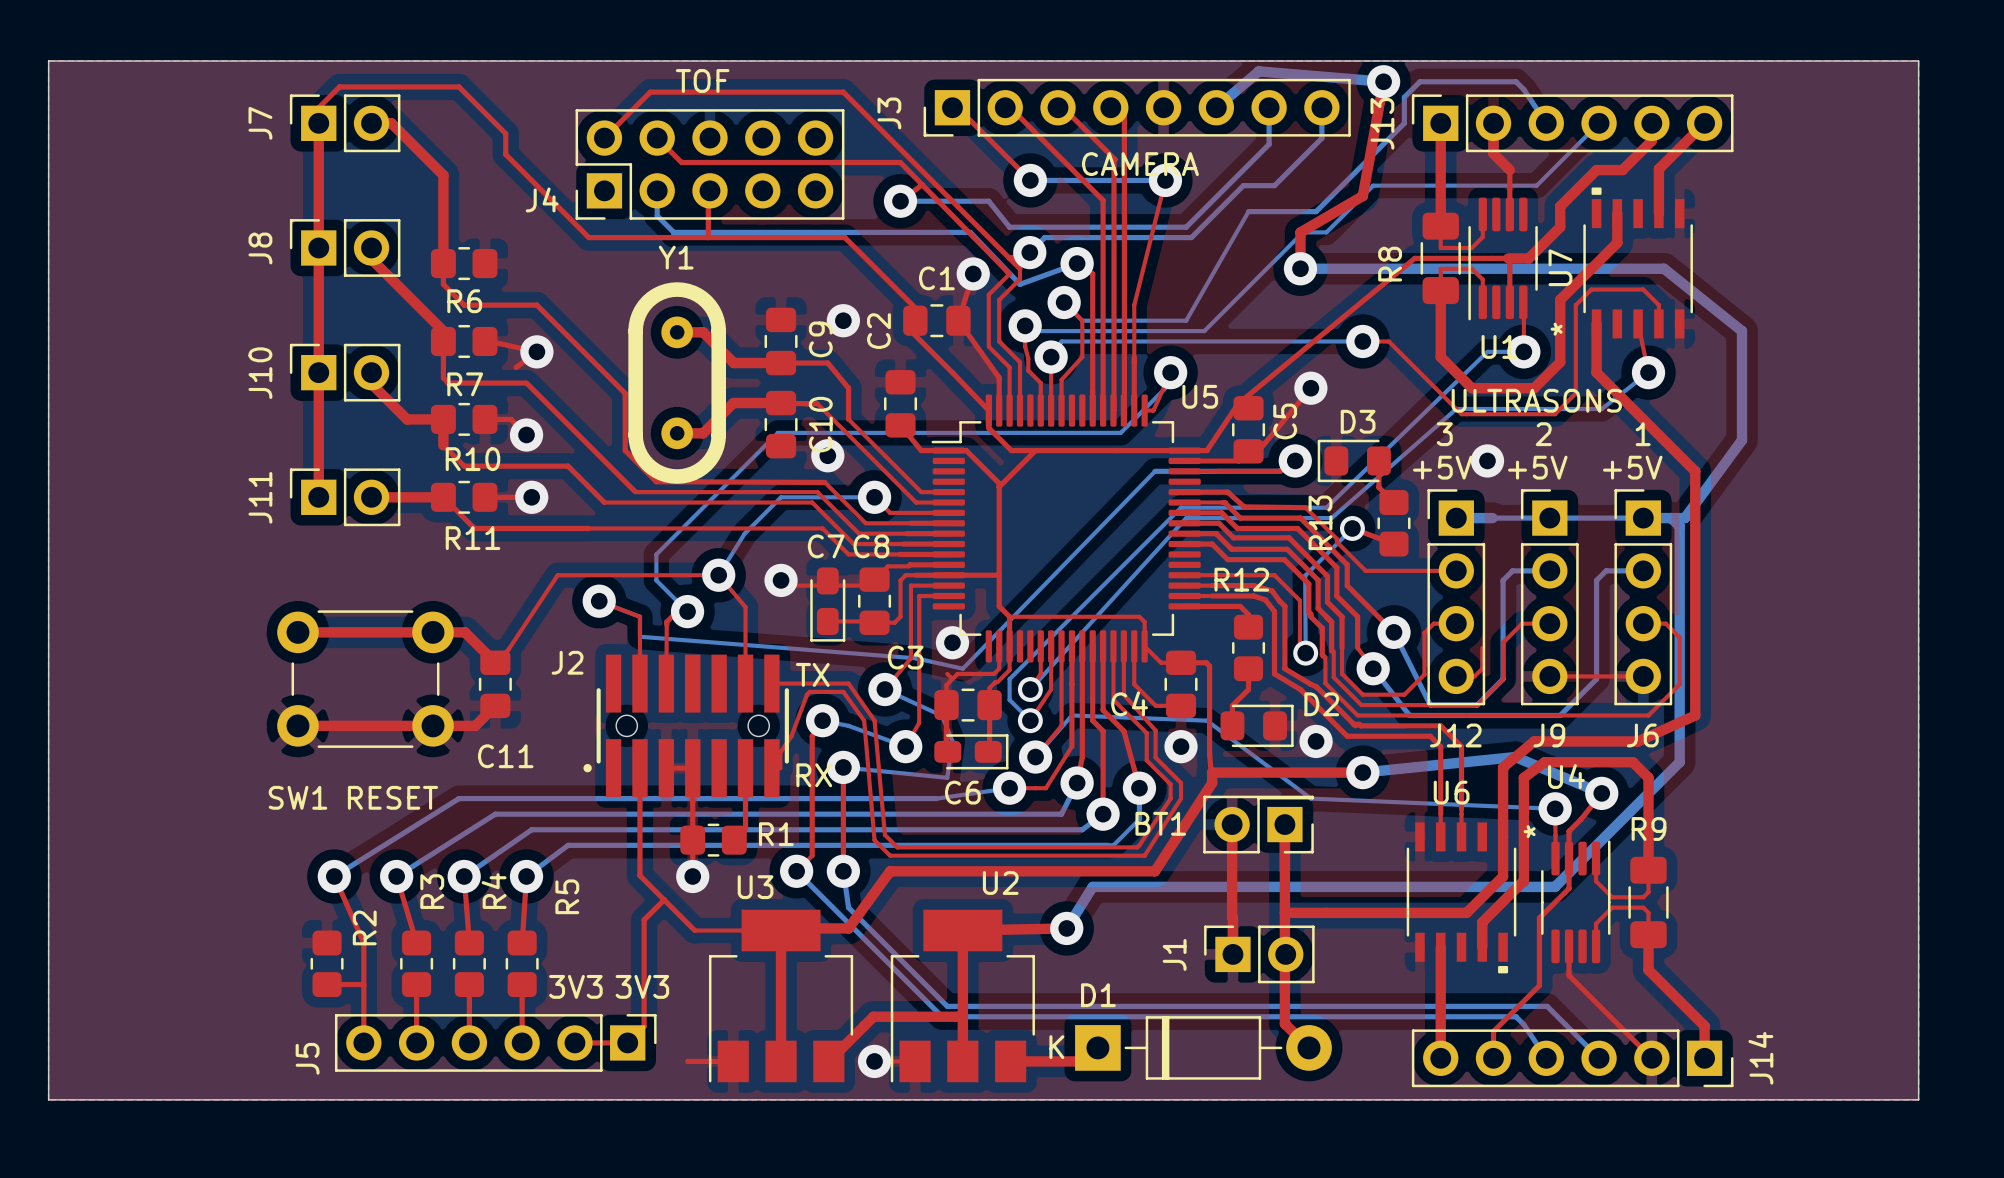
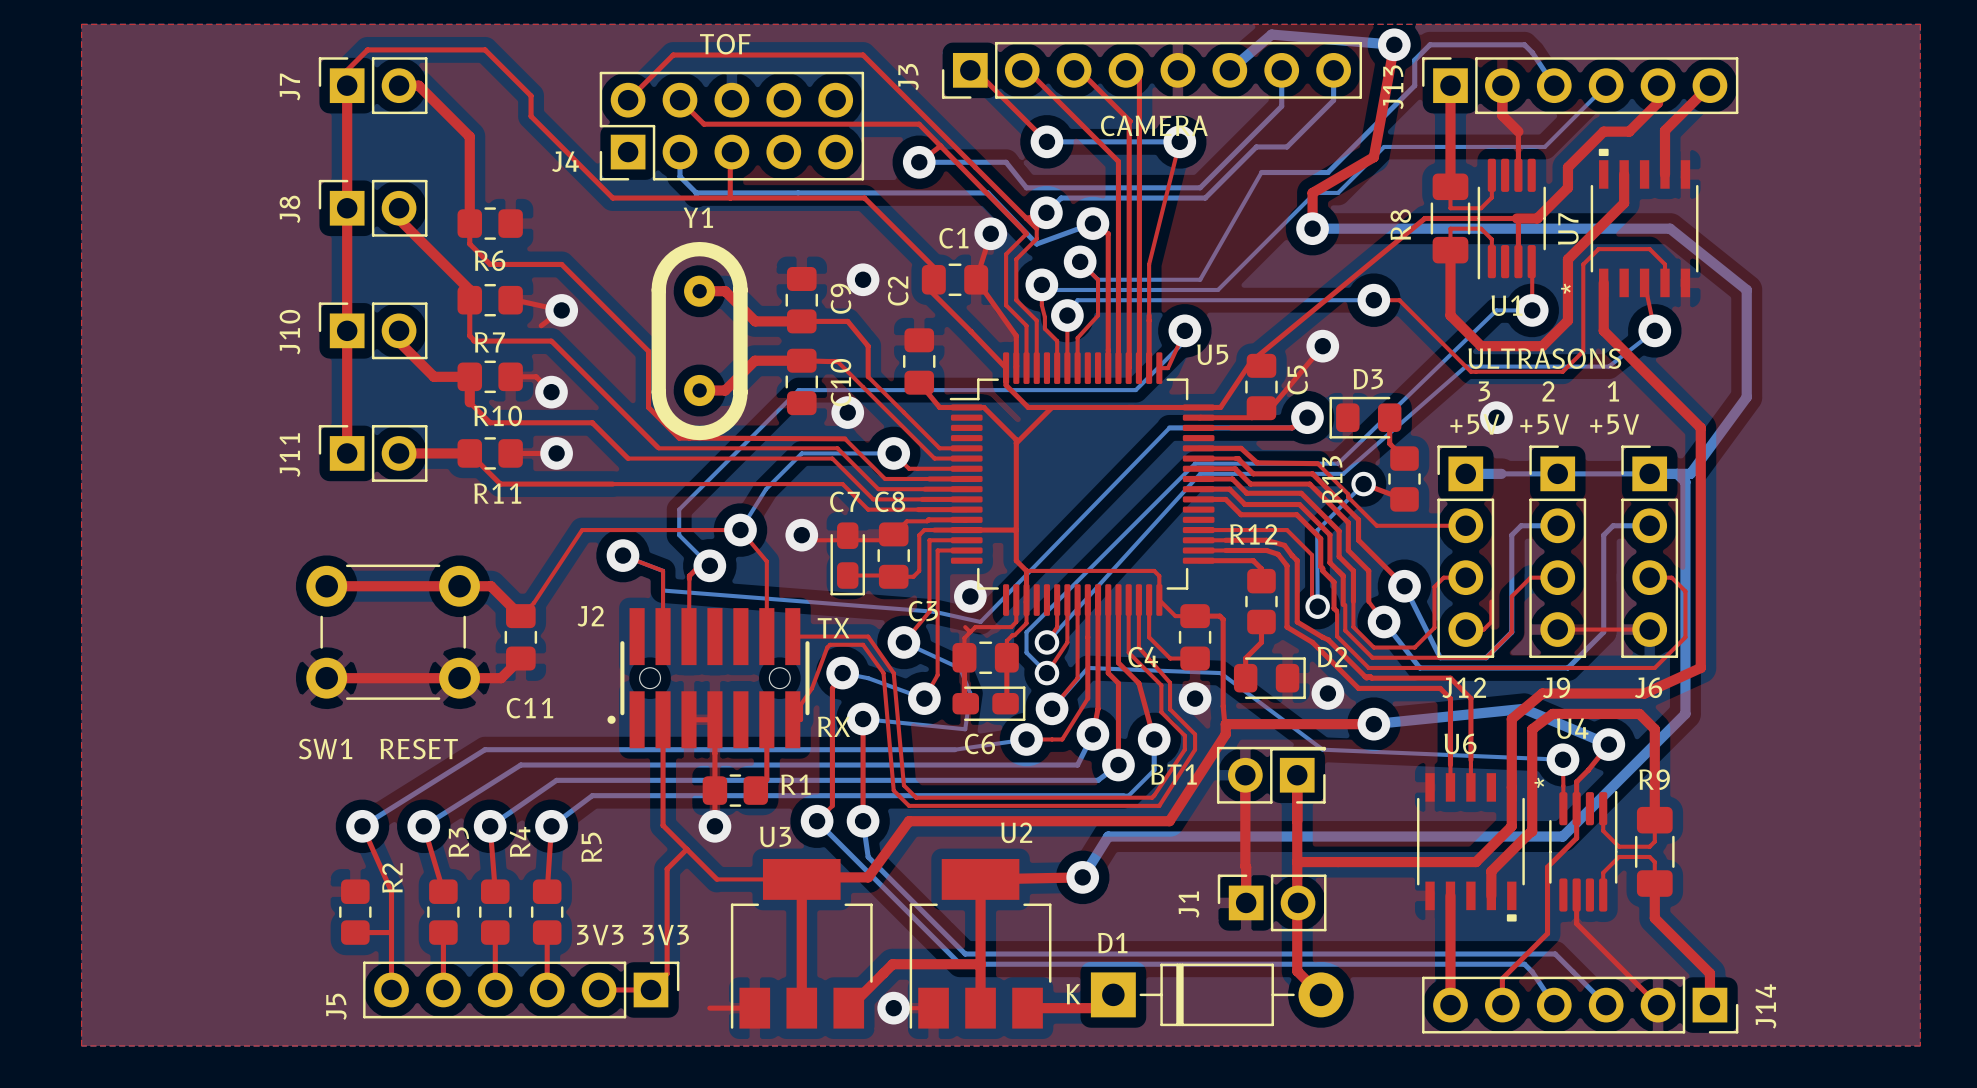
board edge: (48, 60) (48, 1099) (1918, 1099) (1918, 60) (48, 60) -> none

